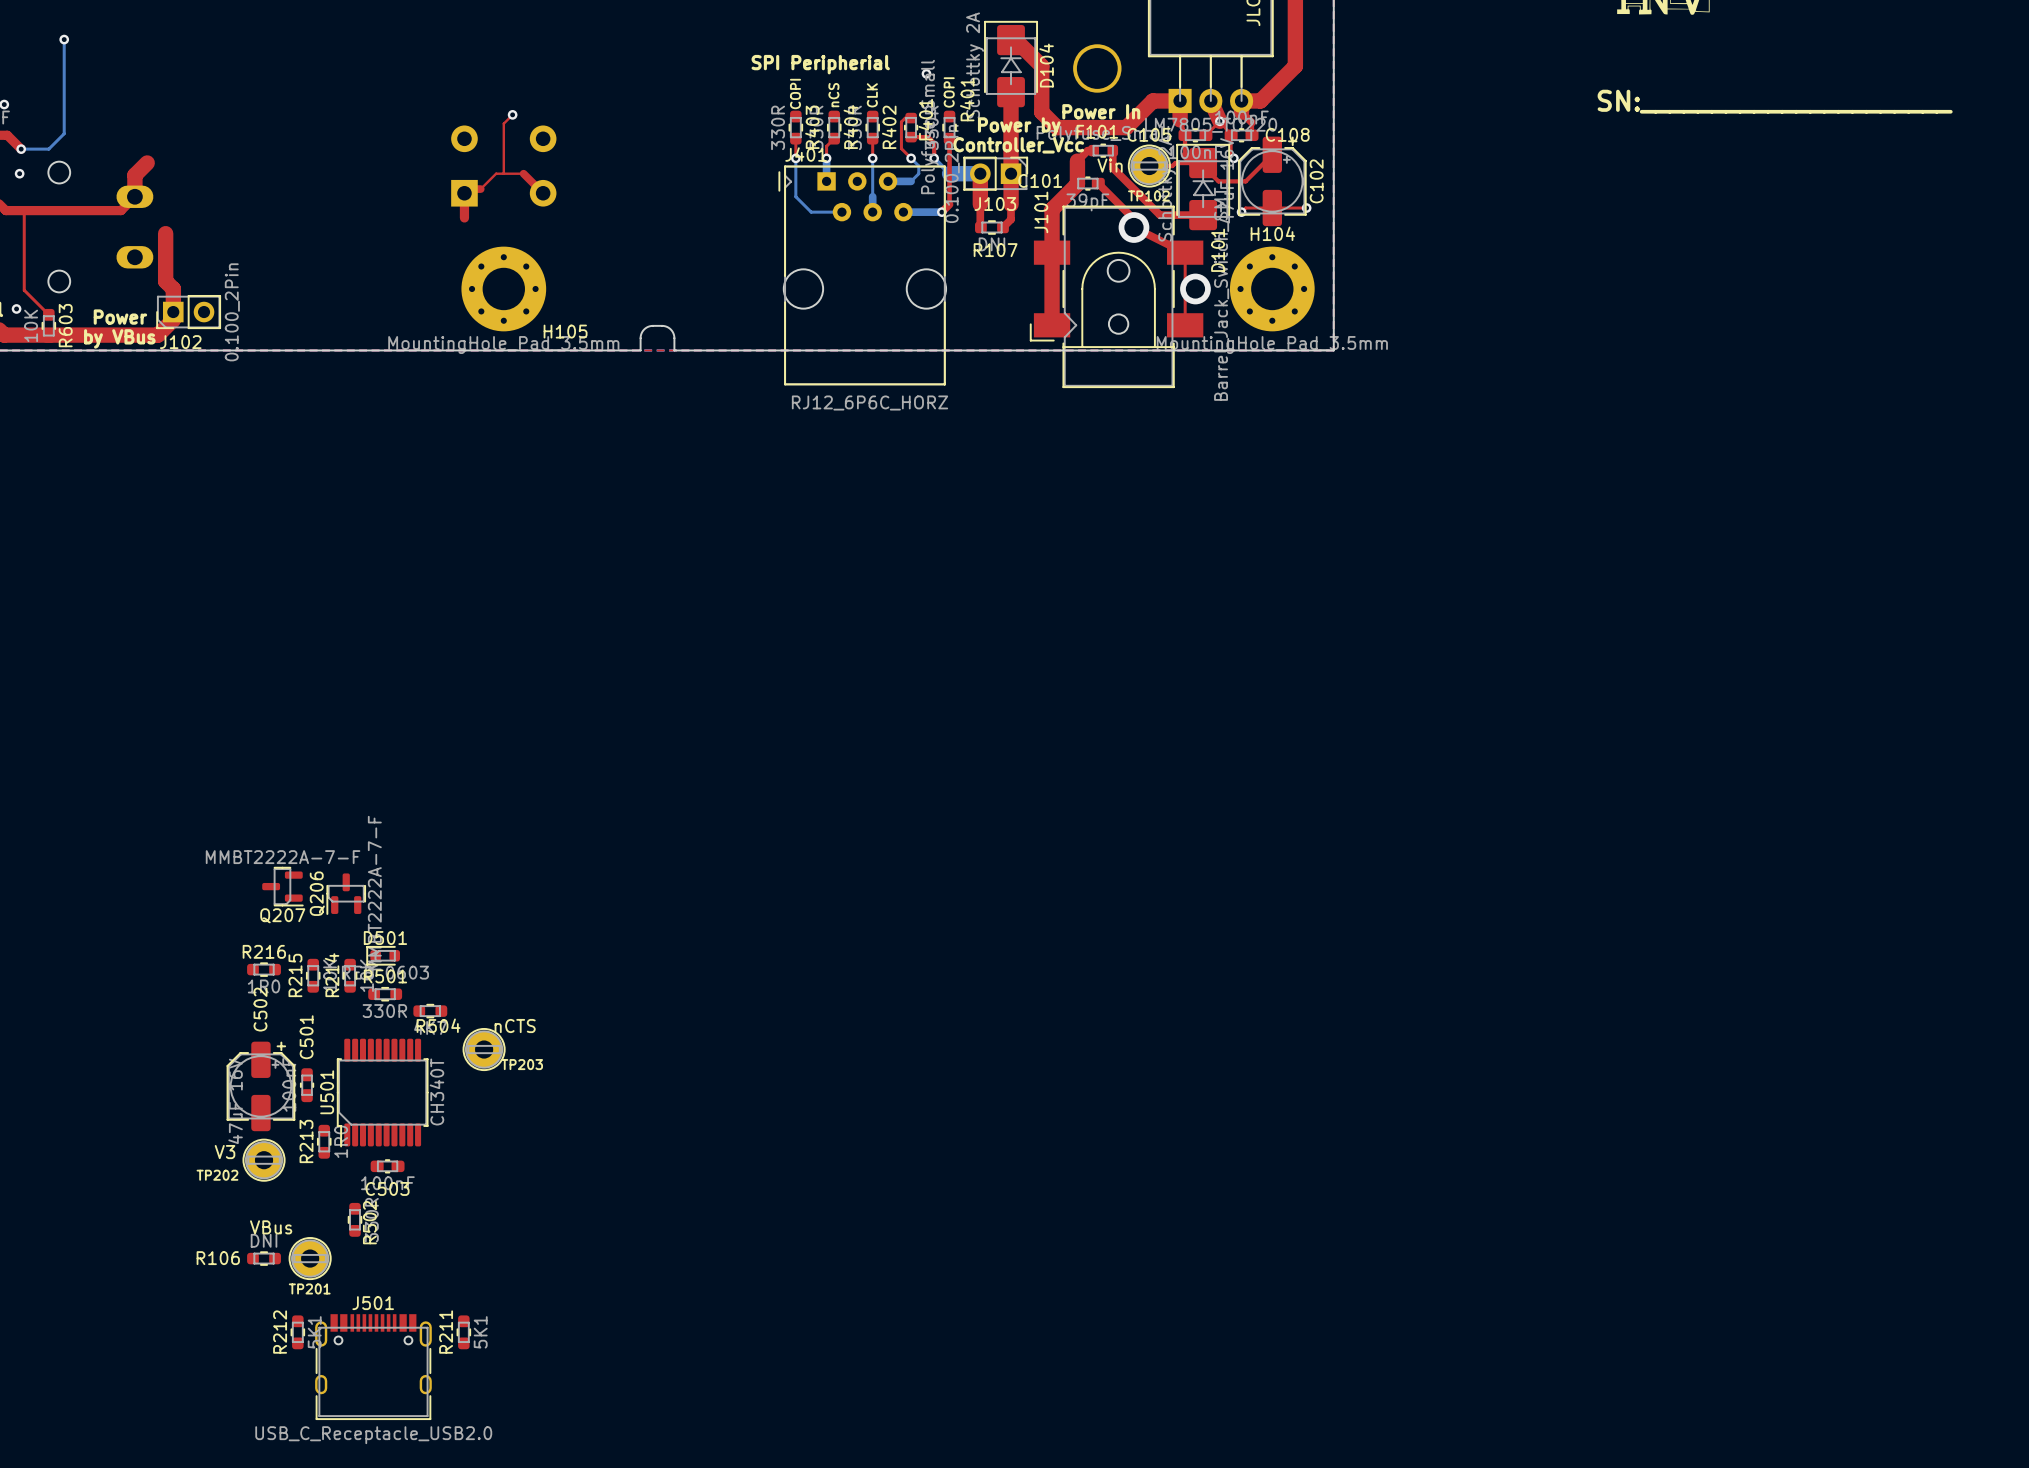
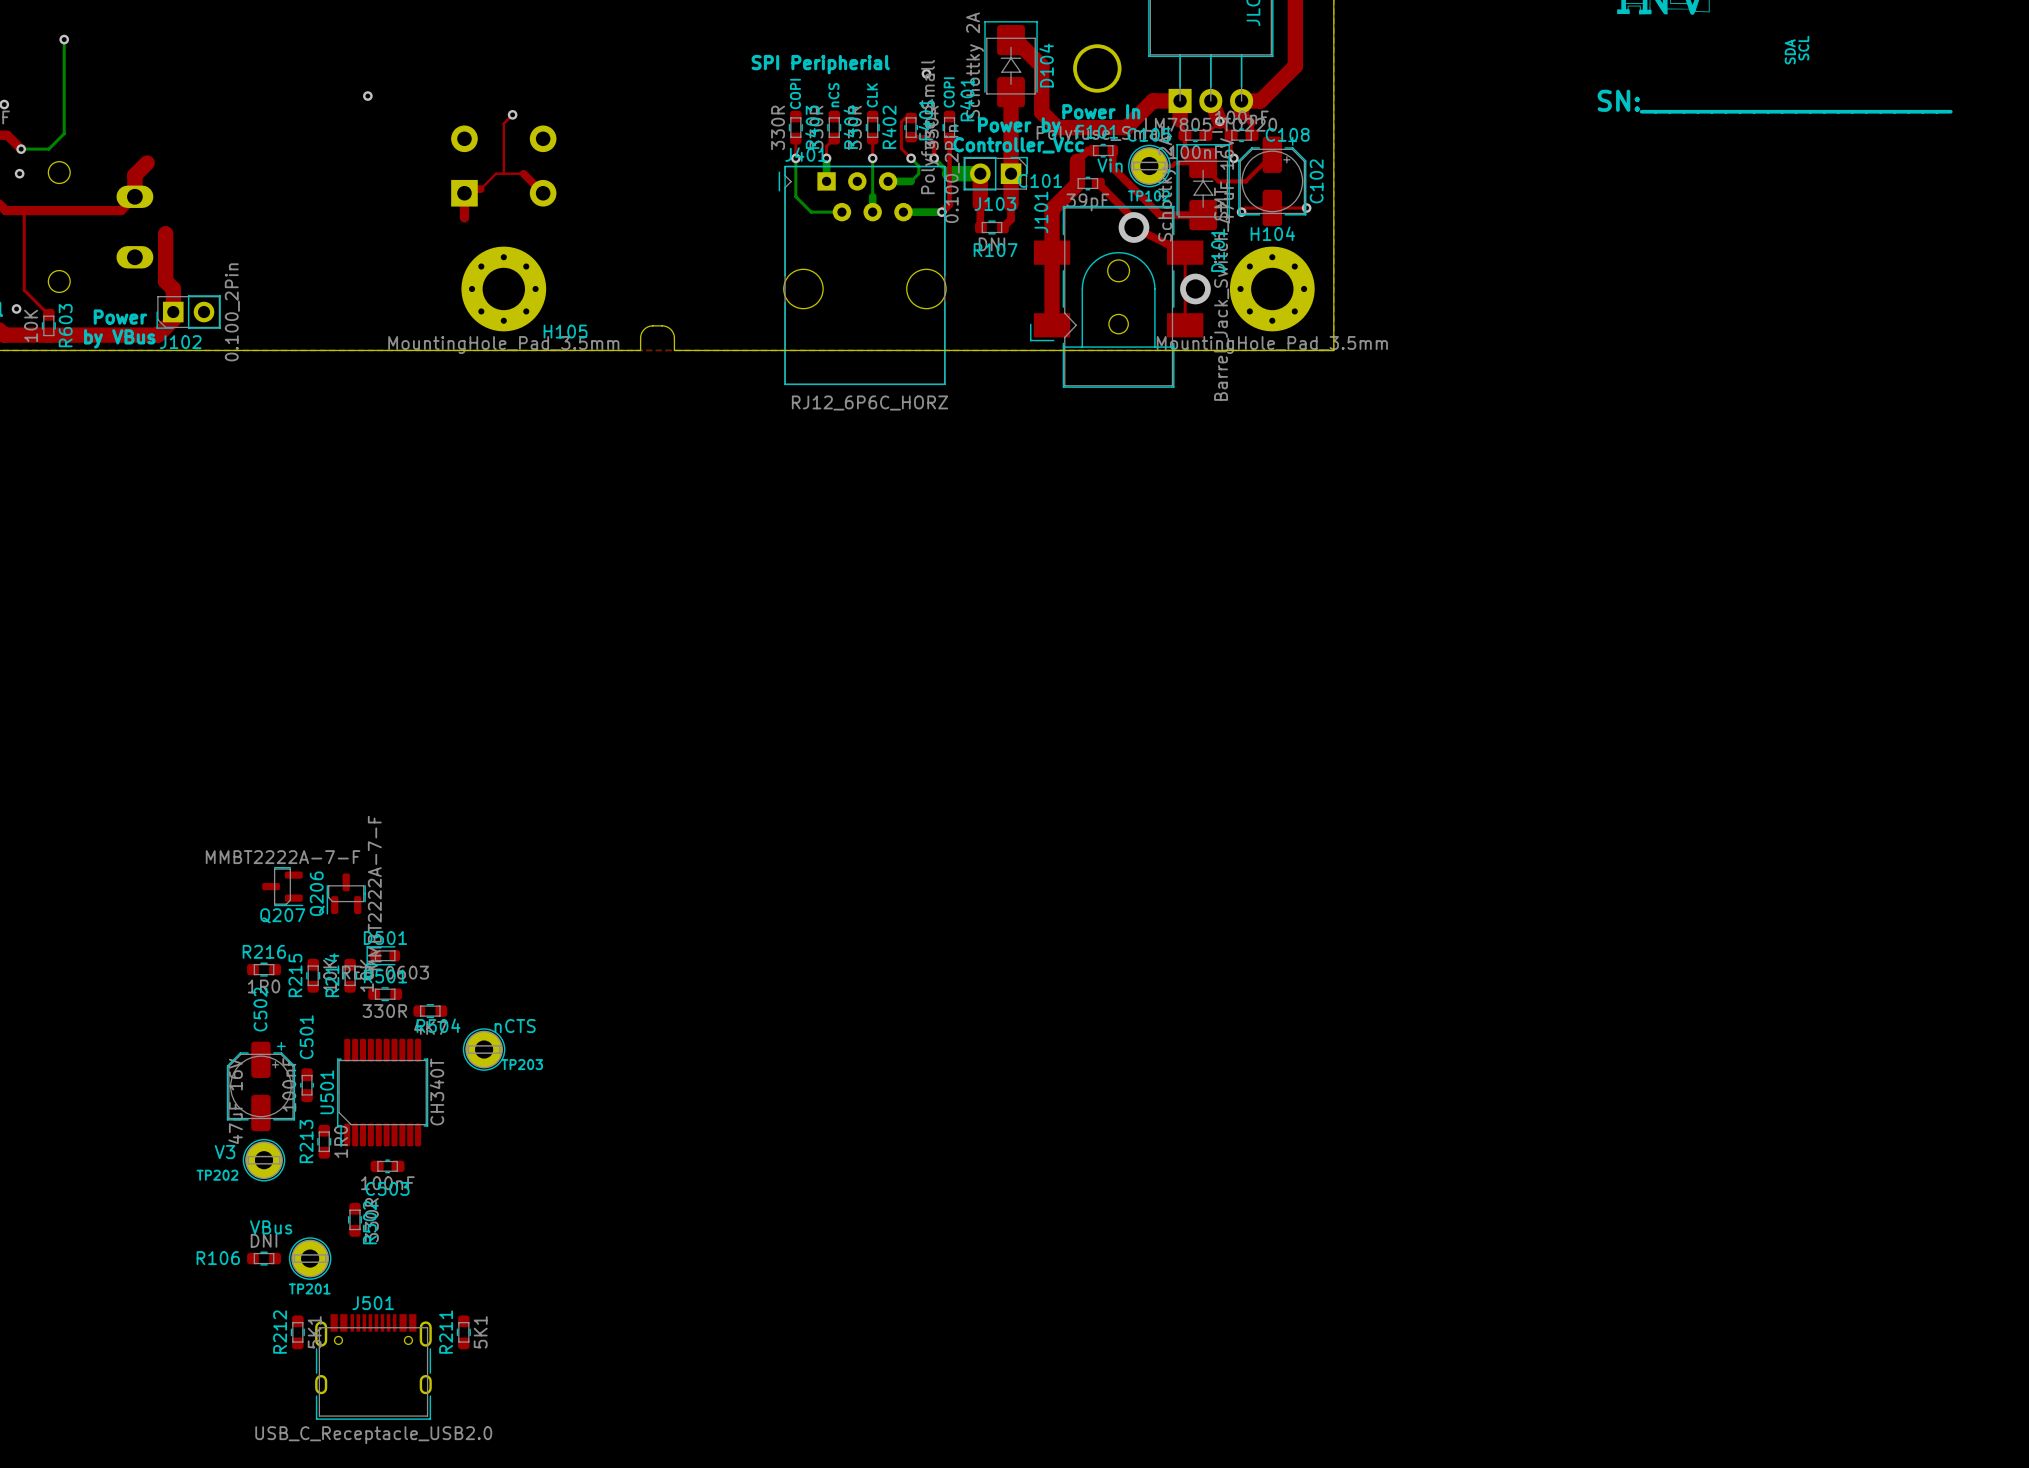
text: none -> SCL (1803, 48)
text: none -> SDA (1790, 51)
via: none -> (367, 96)

